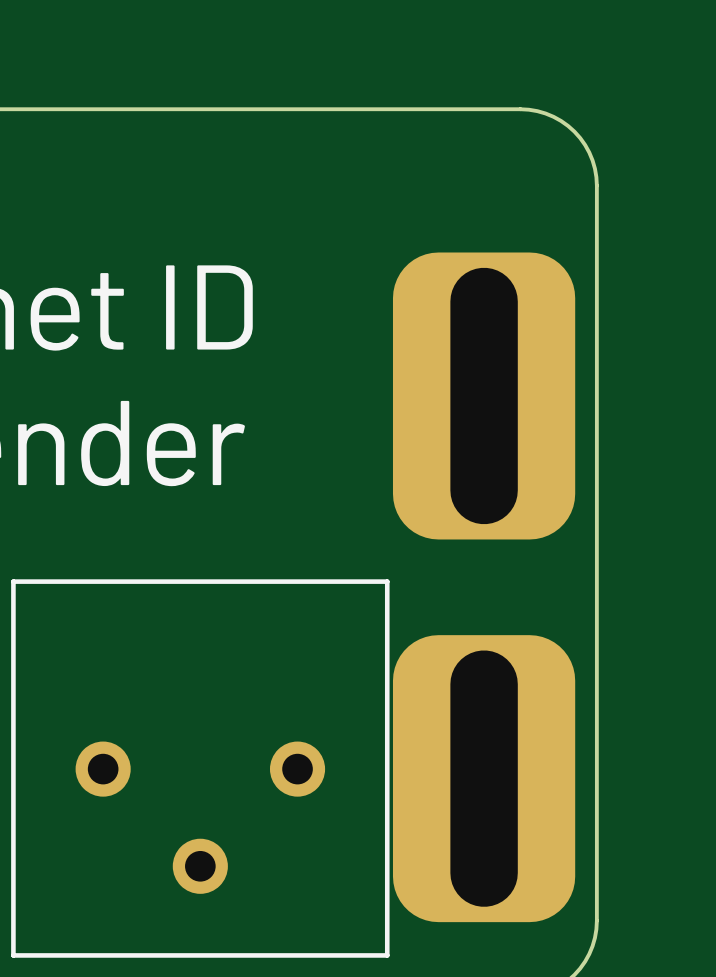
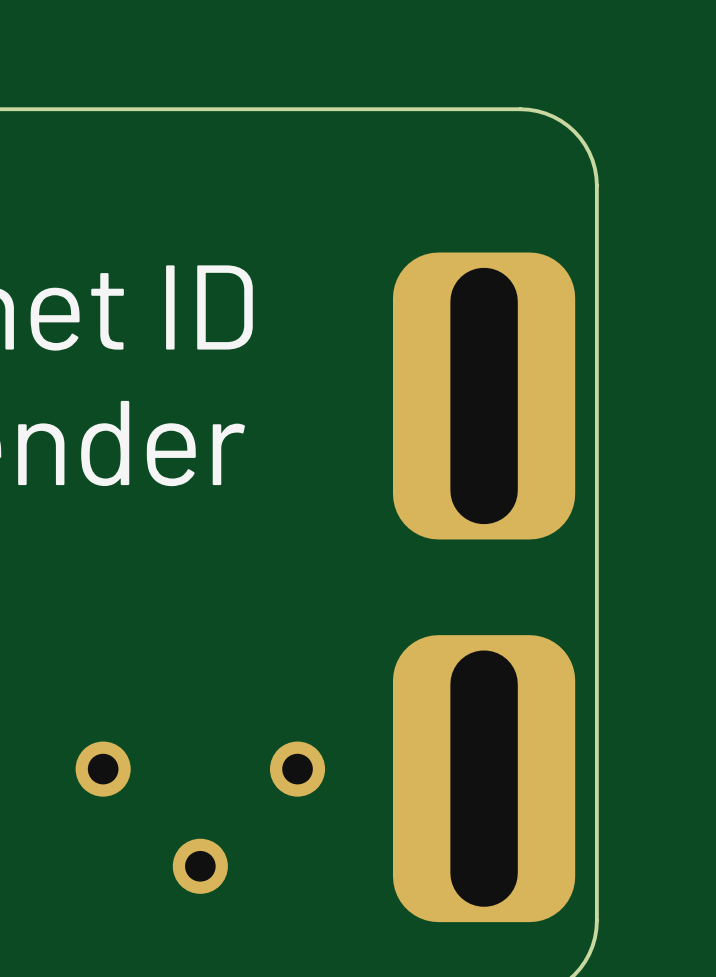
part: (200, 768) -> none

